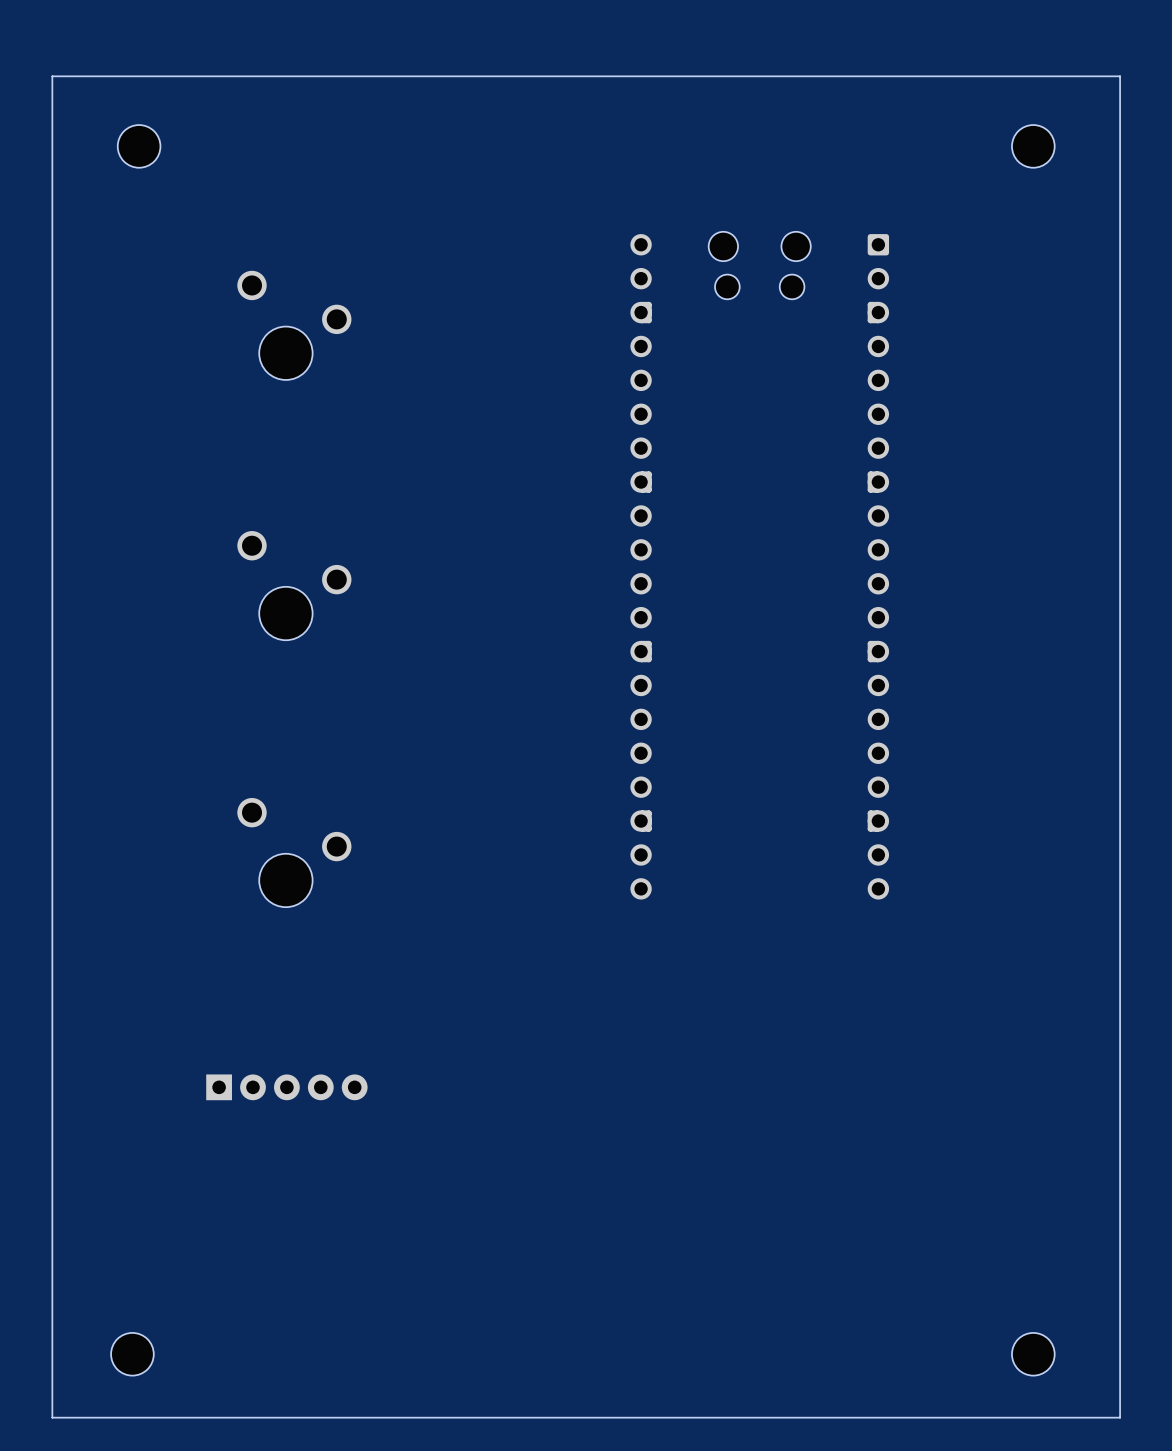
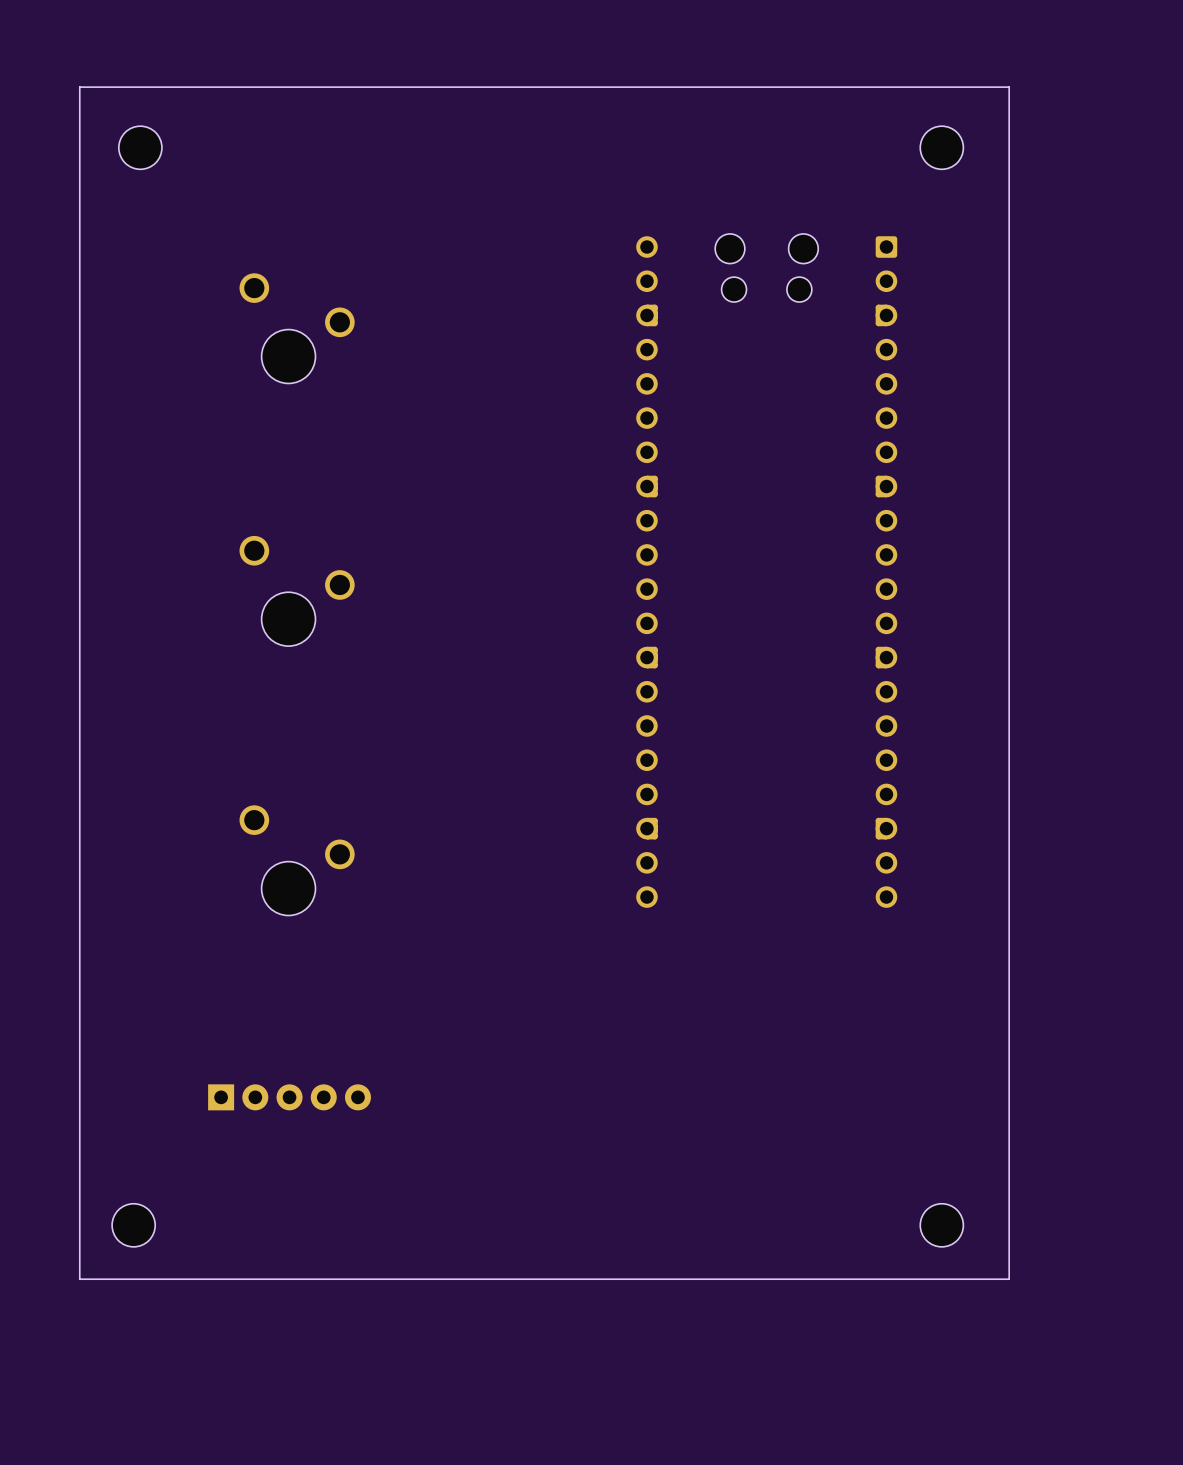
board edge: (1120, 76) (52, 76) (52, 1417) (1120, 1417) (1120, 76) -> (1009, 87) (1009, 1279) (79, 1279) (79, 87) (1009, 87)
part position: (1033, 146) -> (941, 147)
part position: (132, 1354) -> (133, 1225)
part position: (1033, 1354) -> (941, 1225)

